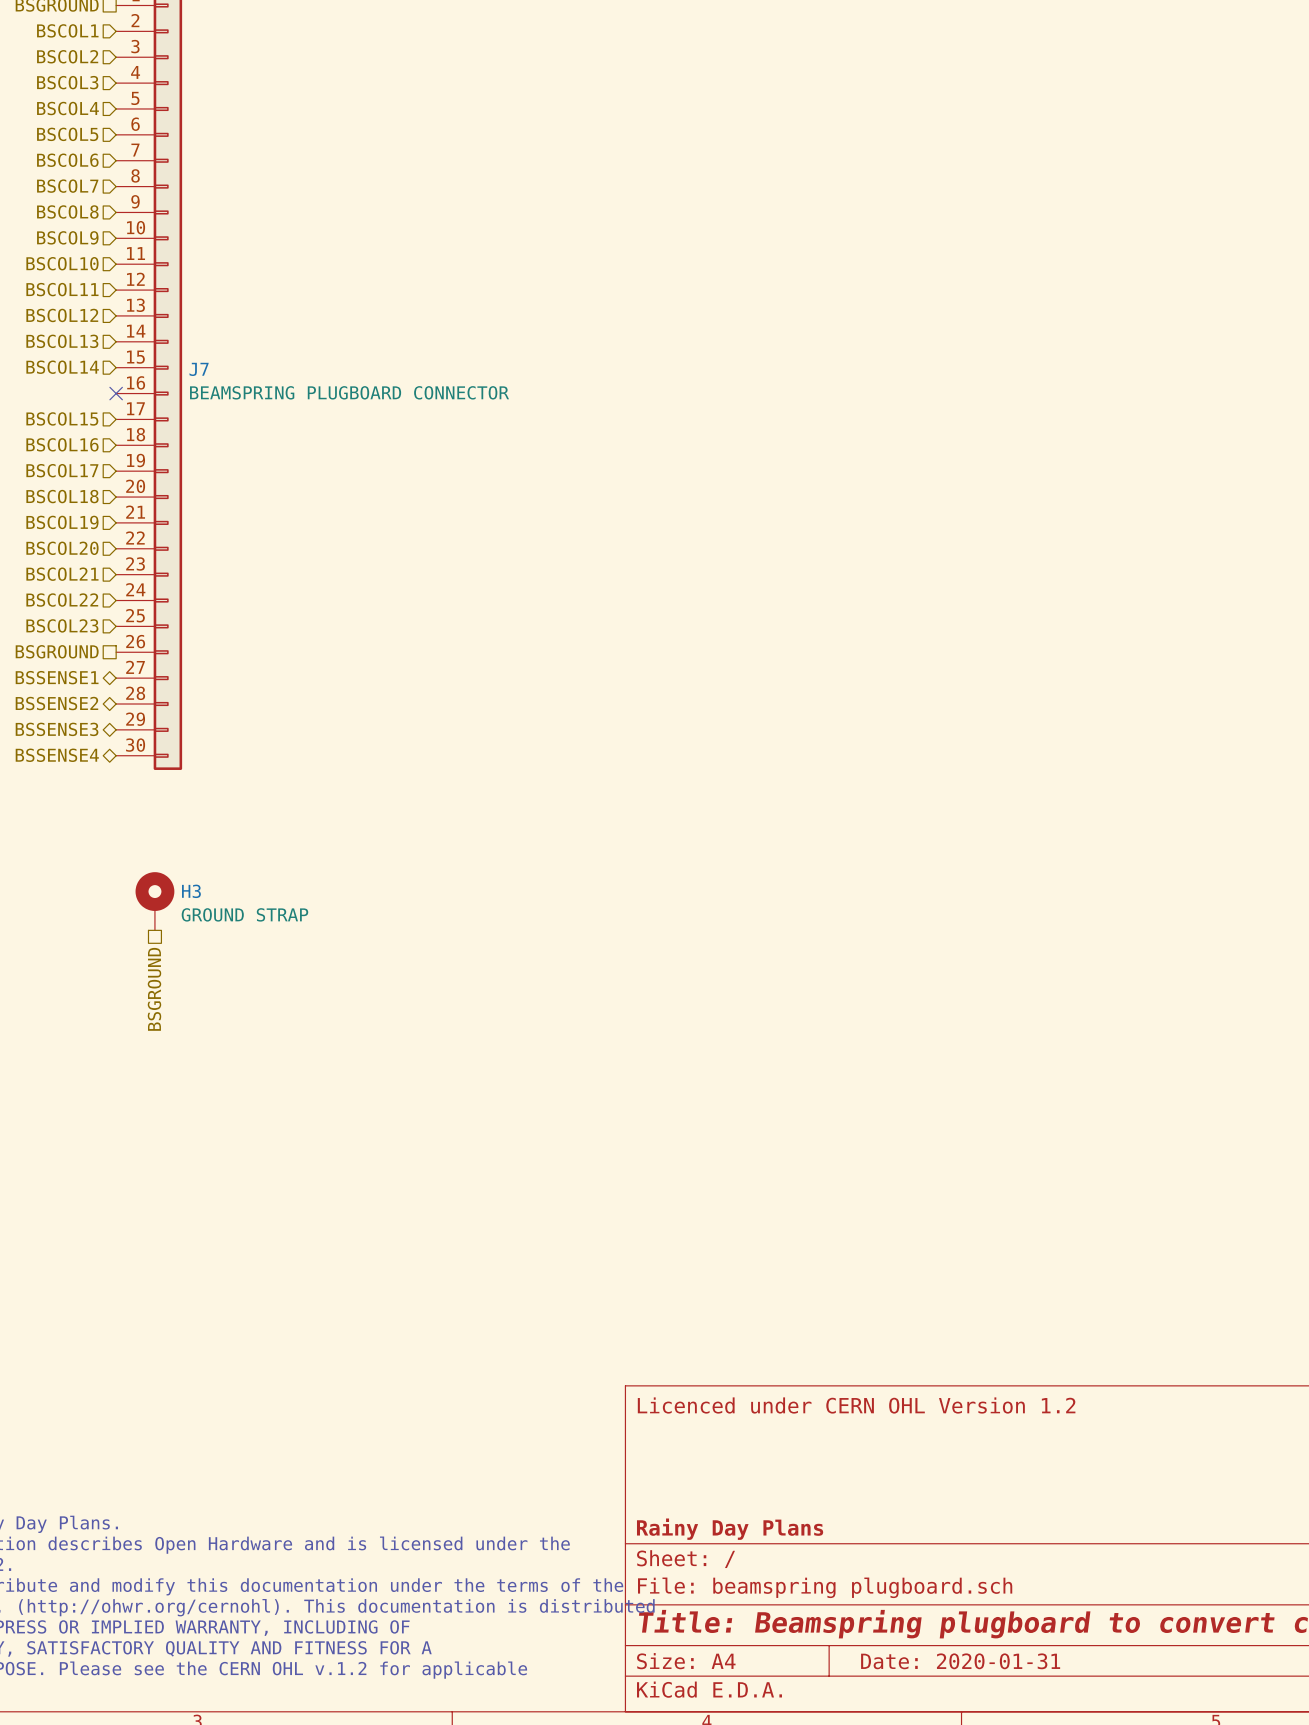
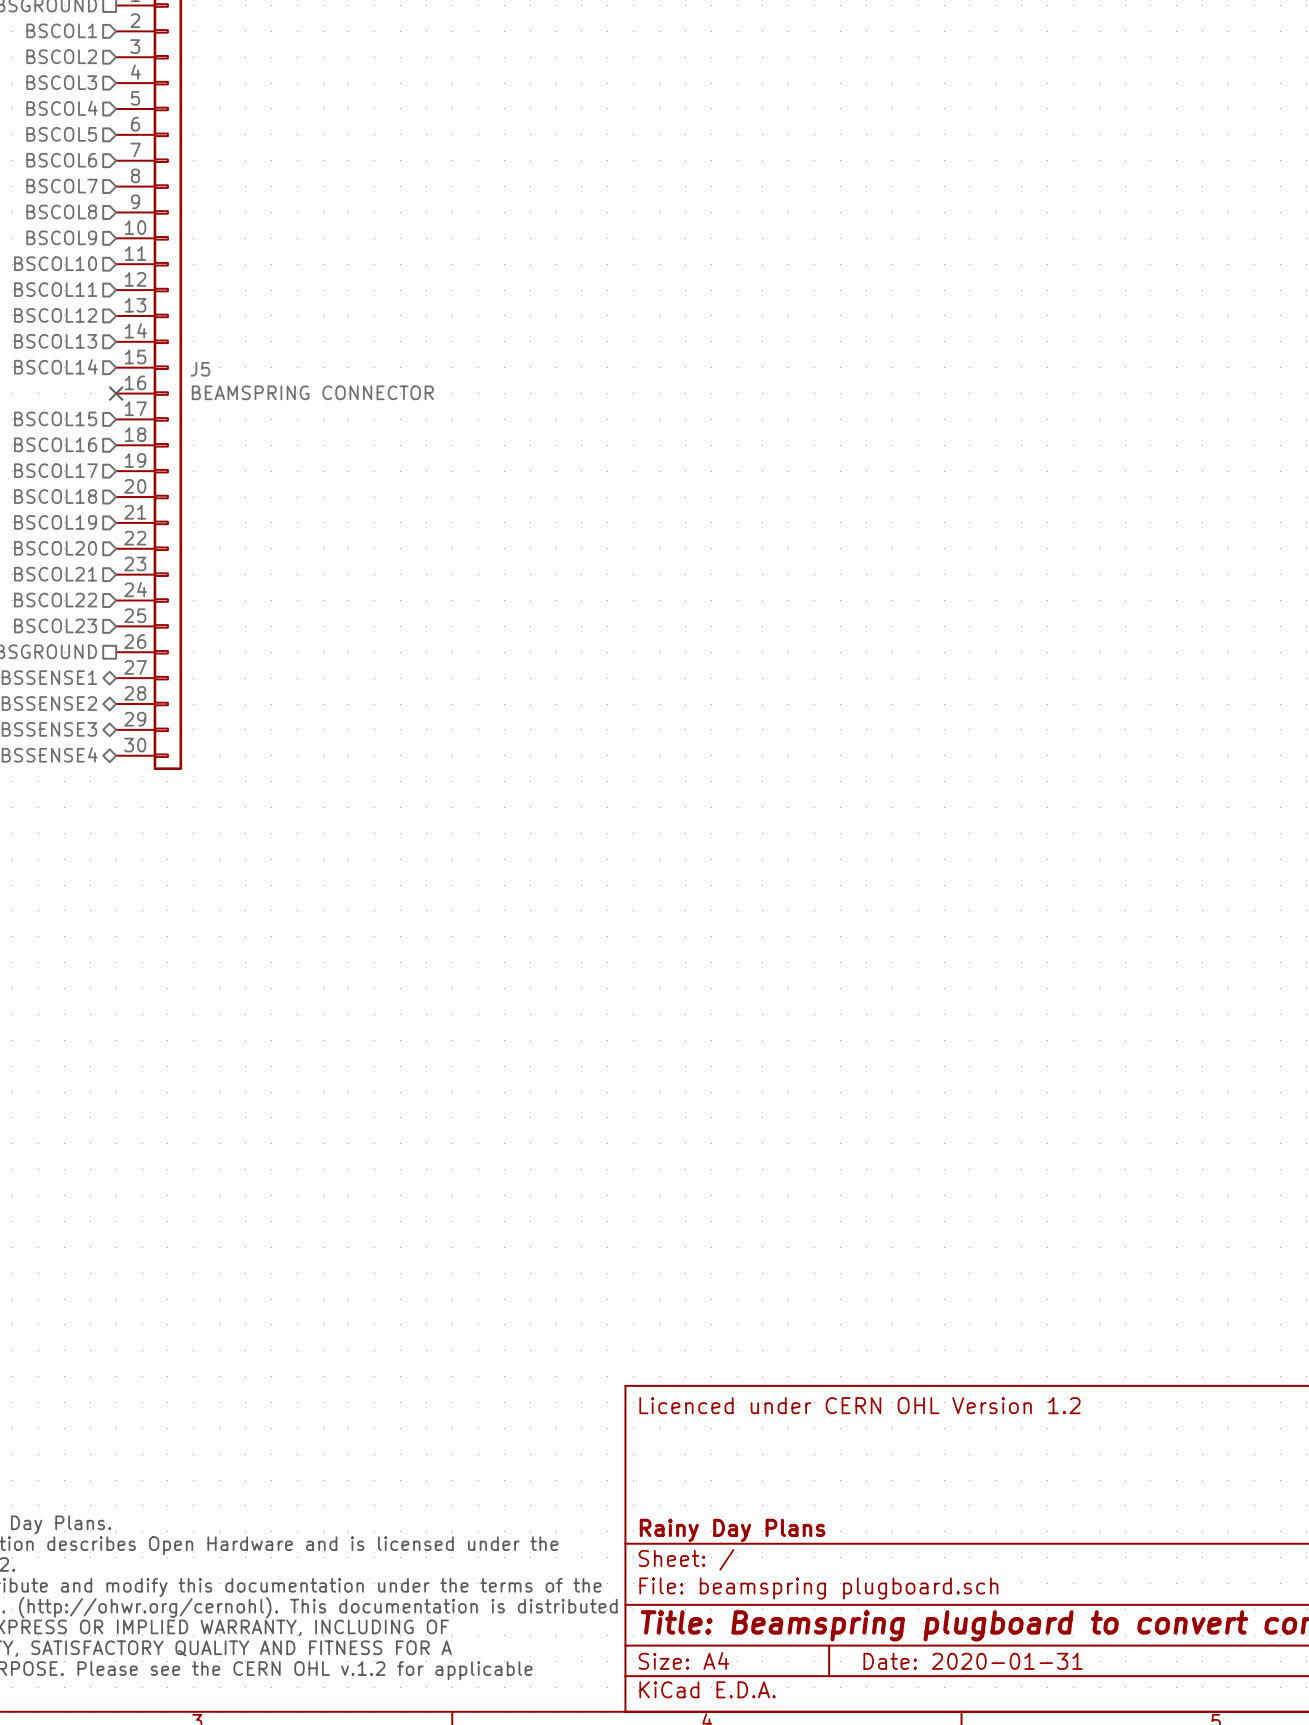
J7 name: J7 (199, 369) -> J5 (200, 369)
J7 value: BEAMSPRING PLUGBOARD CONNECTOR (349, 392) -> BEAMSPRING CONNECTOR (312, 392)
H3: GROUND STRAP (154, 901) -> none
hierarchical label: BSGROUND (154, 989) -> none

